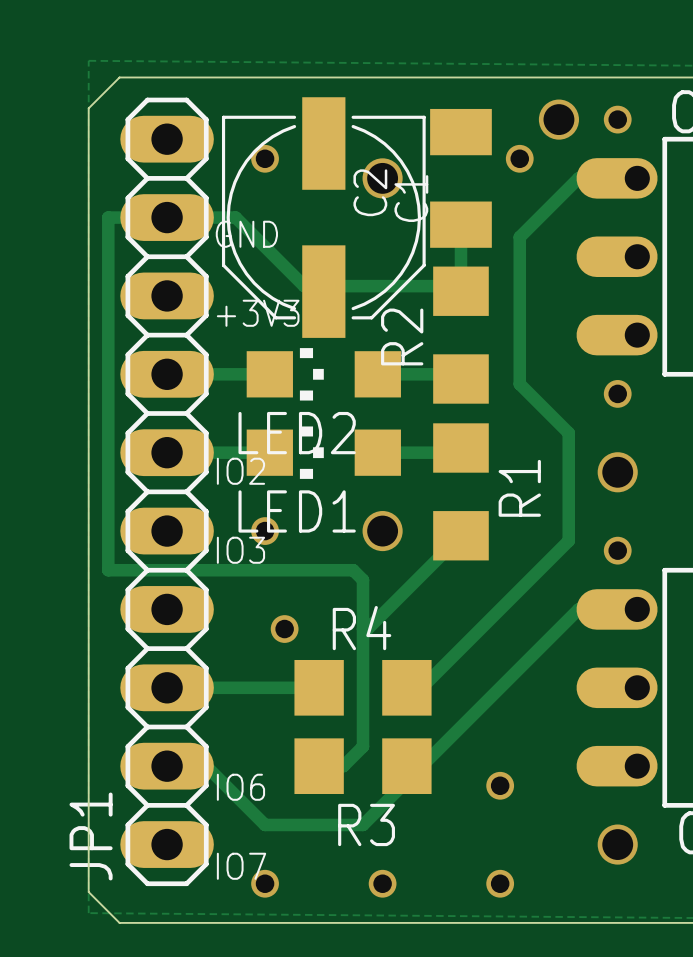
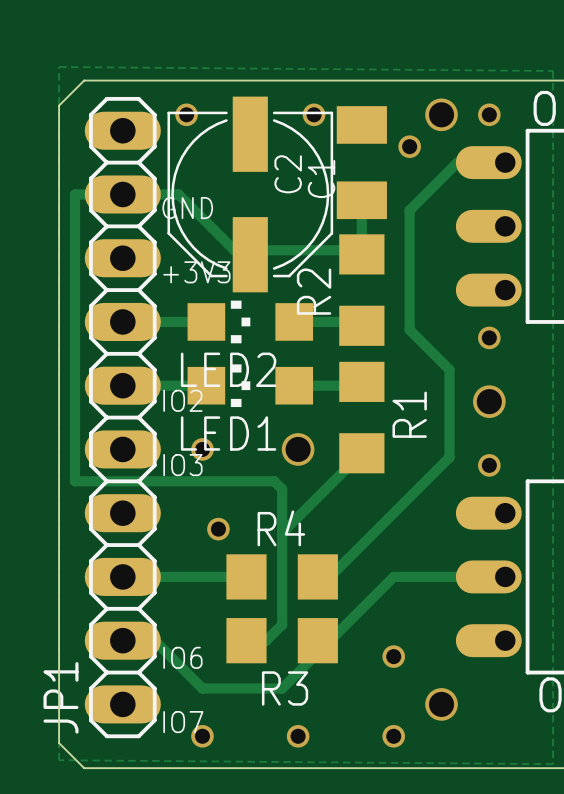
via: none -> (314, 114)
via position: (265, 158) -> (186, 114)
via: (382, 178) -> none
track: (637, 609) (578, 609) (500, 687) -> (505, 576) (393, 576)
via position: (617, 844) -> (441, 704)

